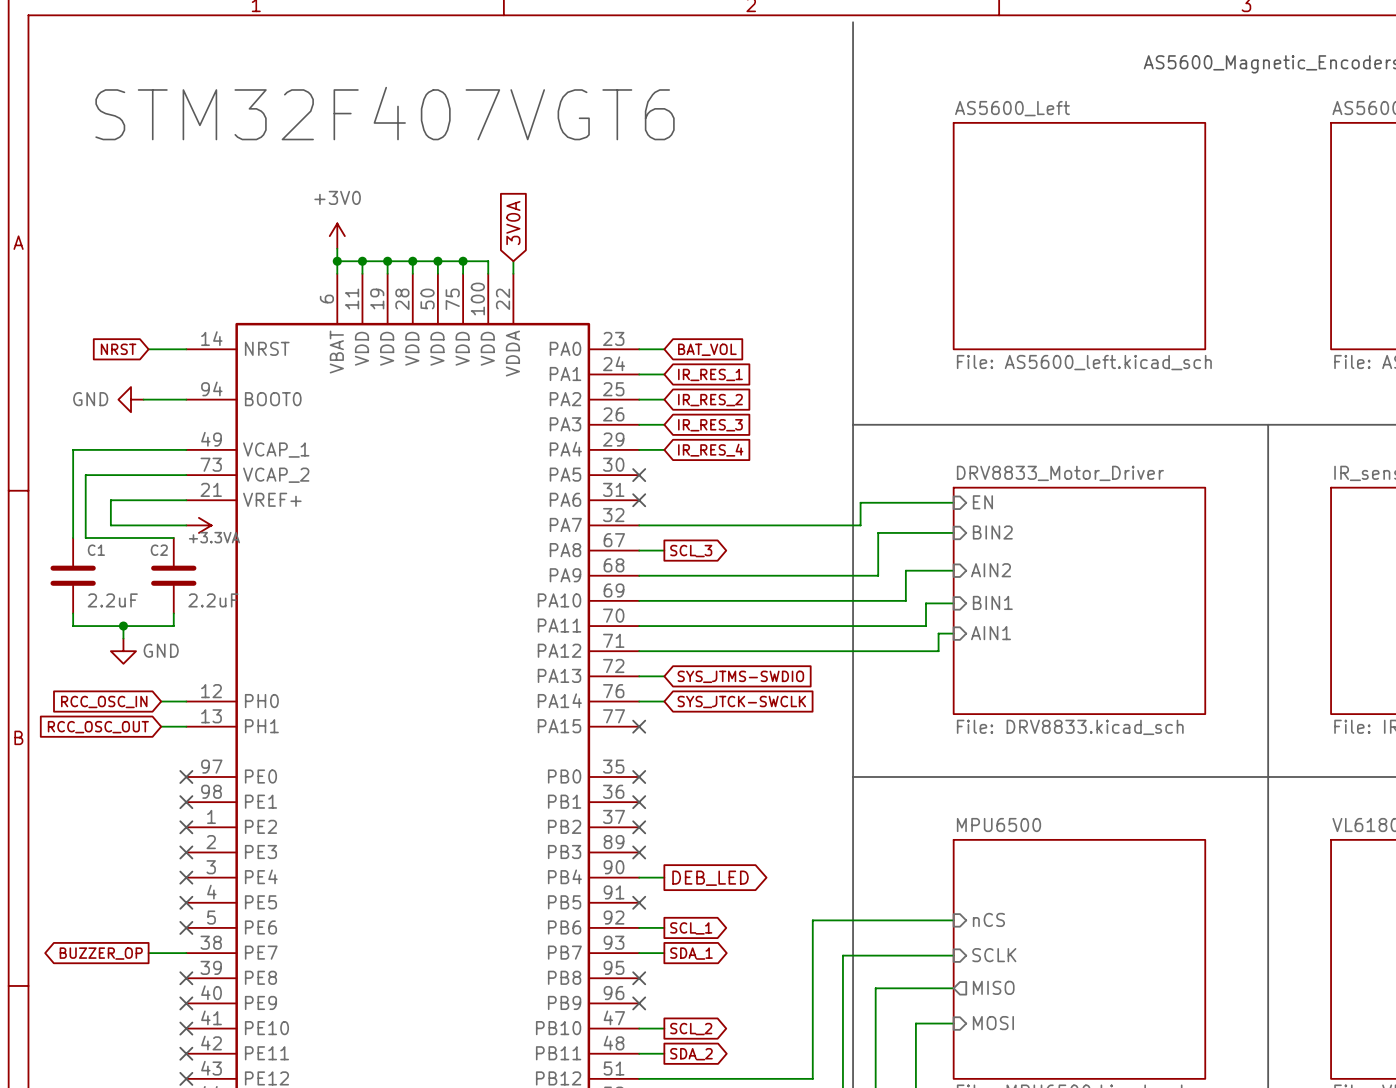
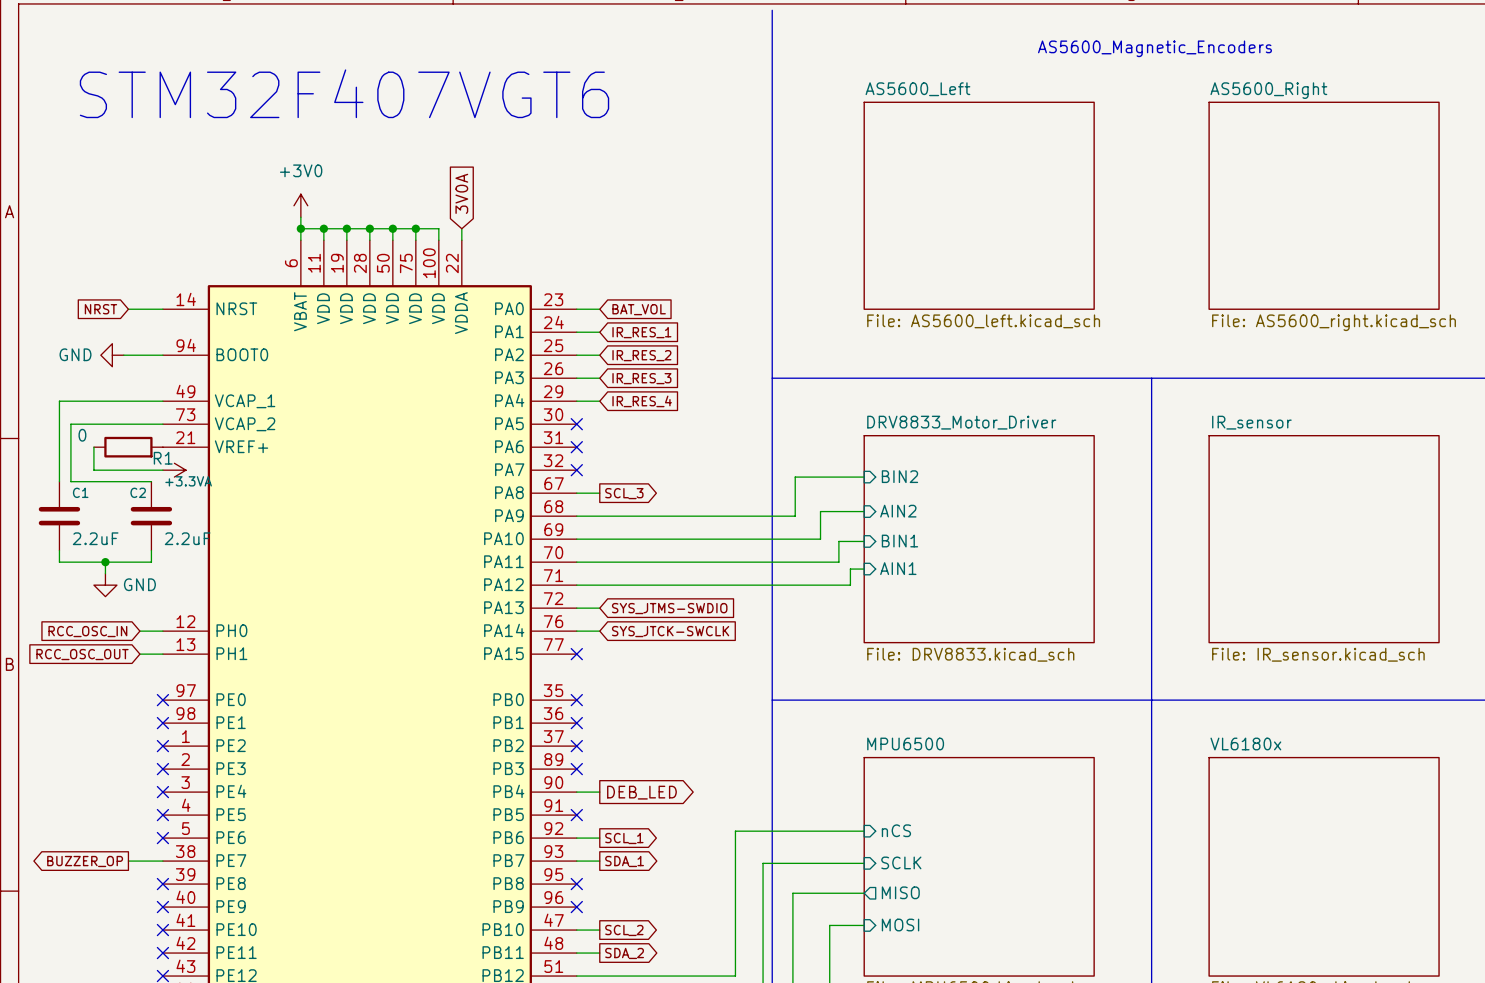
wire: (110, 500) (186, 500) -> none
R1: none -> 0 (128, 447)
wire: (953, 502) (860, 502) (860, 525) (639, 525) -> none
sheet pin: EN (982, 502) -> none
no-connect mark: none -> (576, 470)

